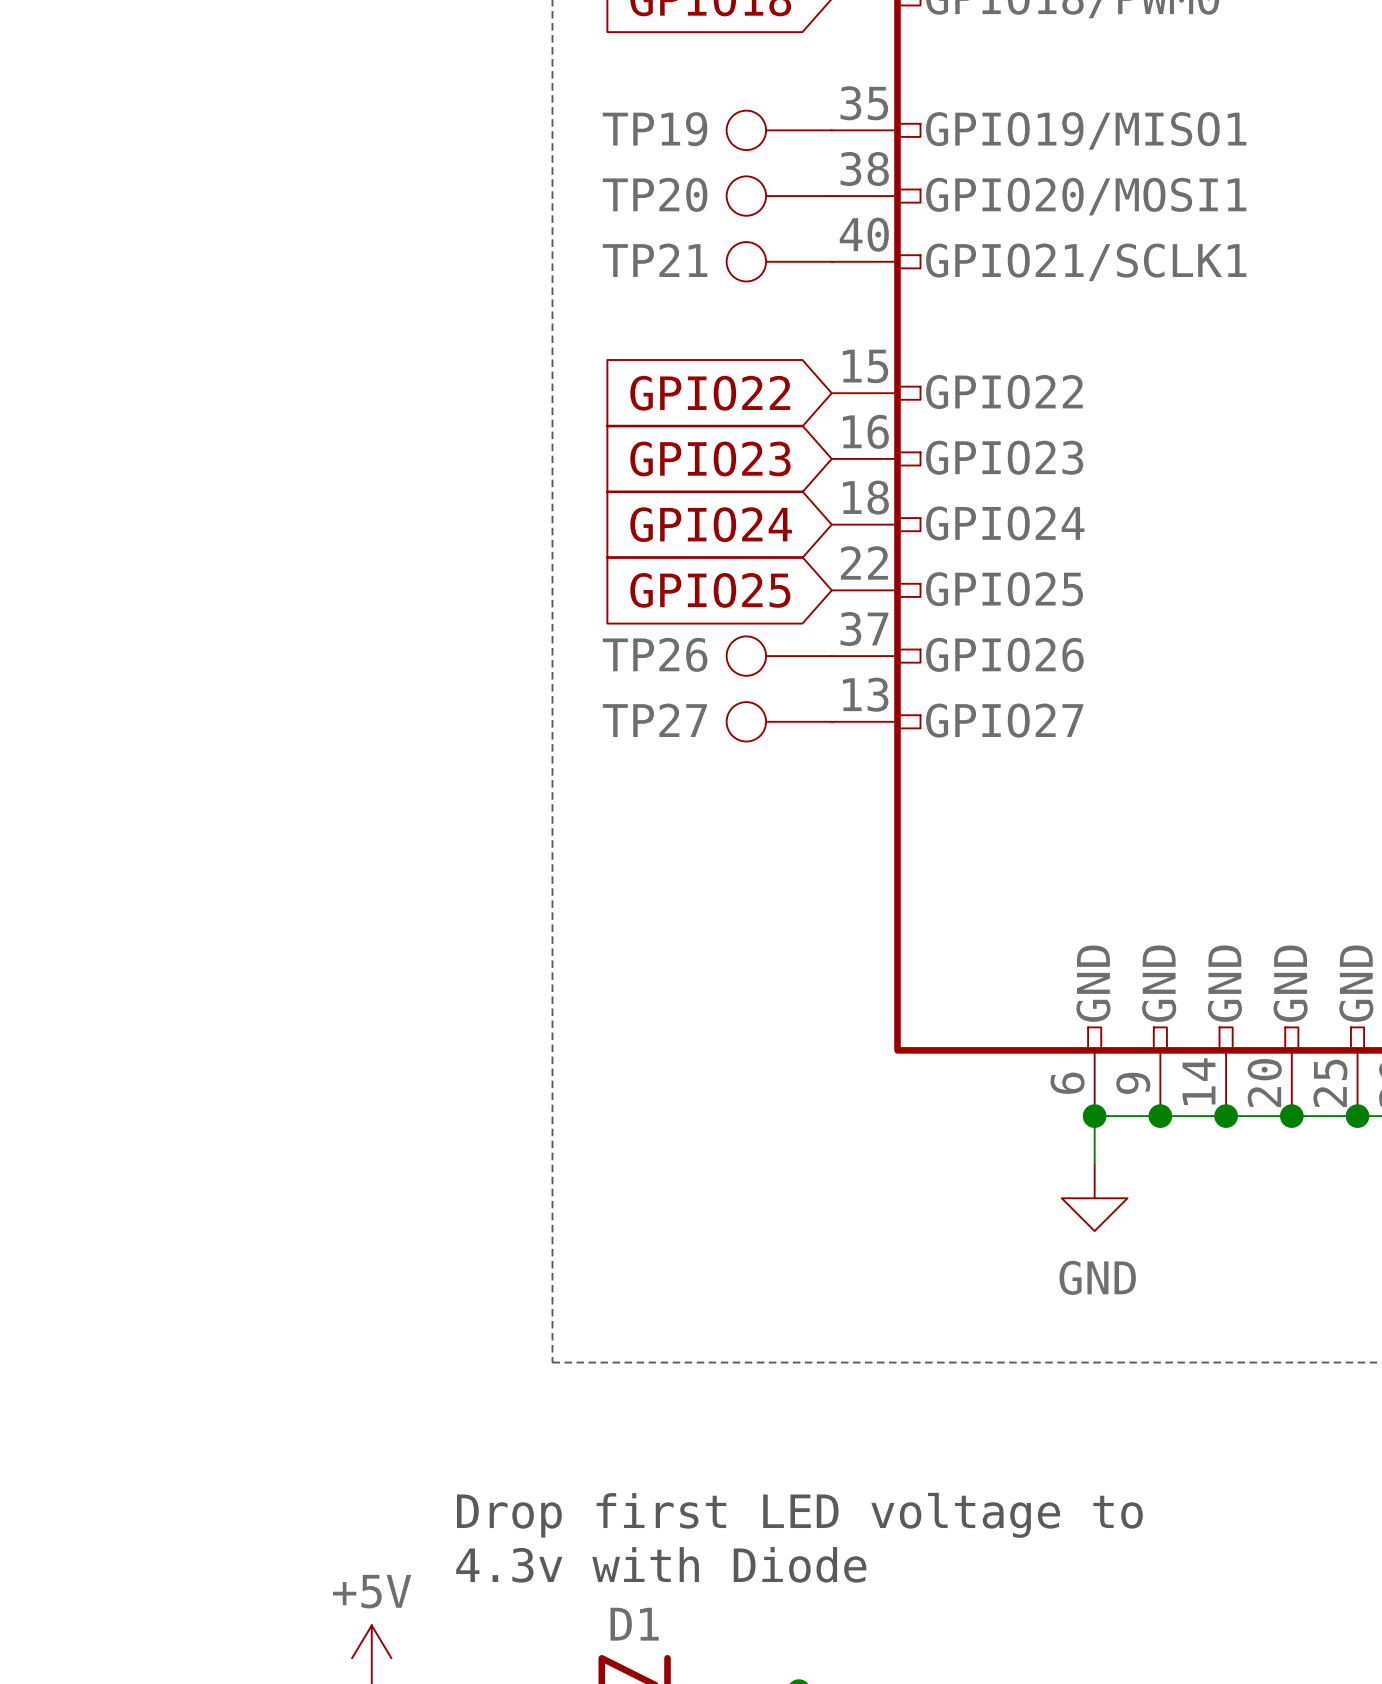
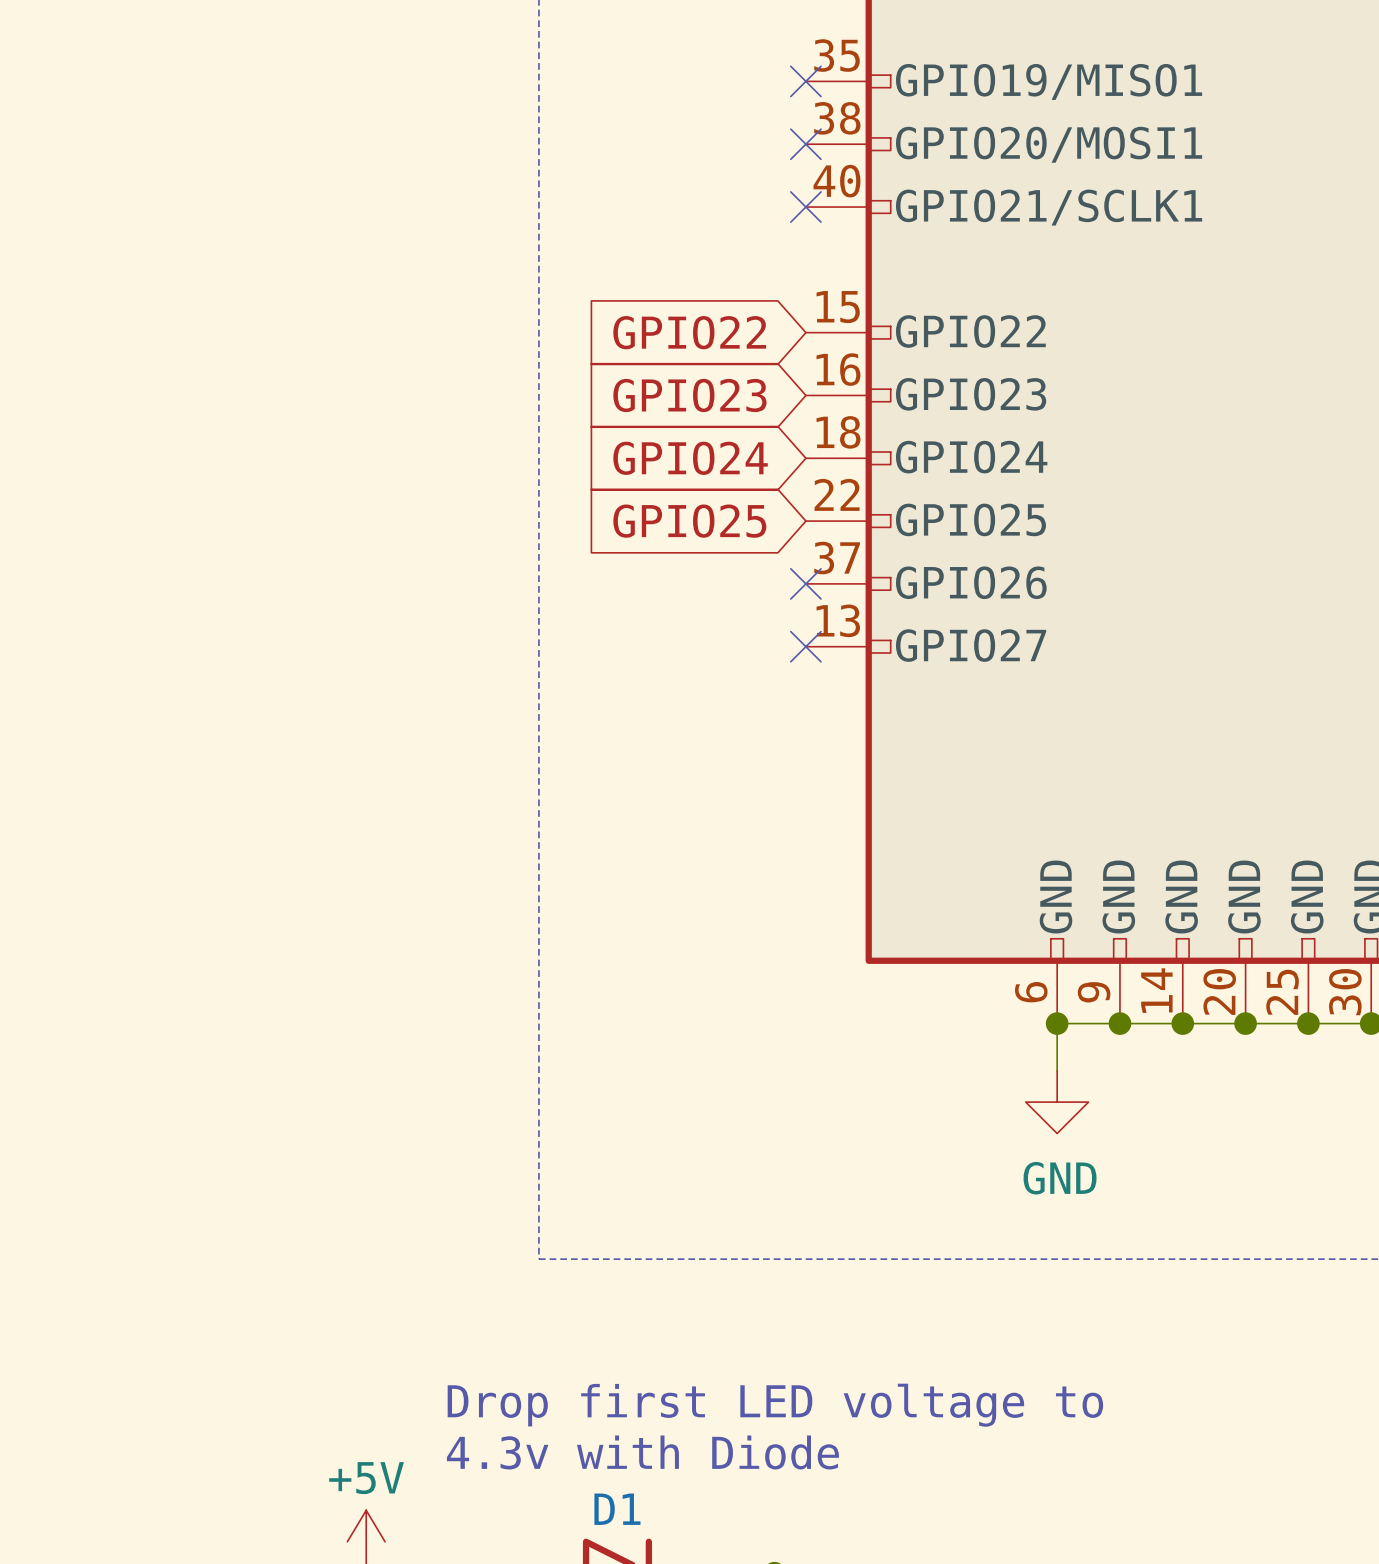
TP19: (779, 130) -> none
no-connect mark: none -> (805, 81)
TP20: (779, 196) -> none
no-connect mark: none -> (805, 144)
TP21: (779, 261) -> none
no-connect mark: none -> (805, 207)
TP26: (779, 656) -> none
no-connect mark: none -> (805, 583)
TP27: (779, 721) -> none
no-connect mark: none -> (805, 646)

